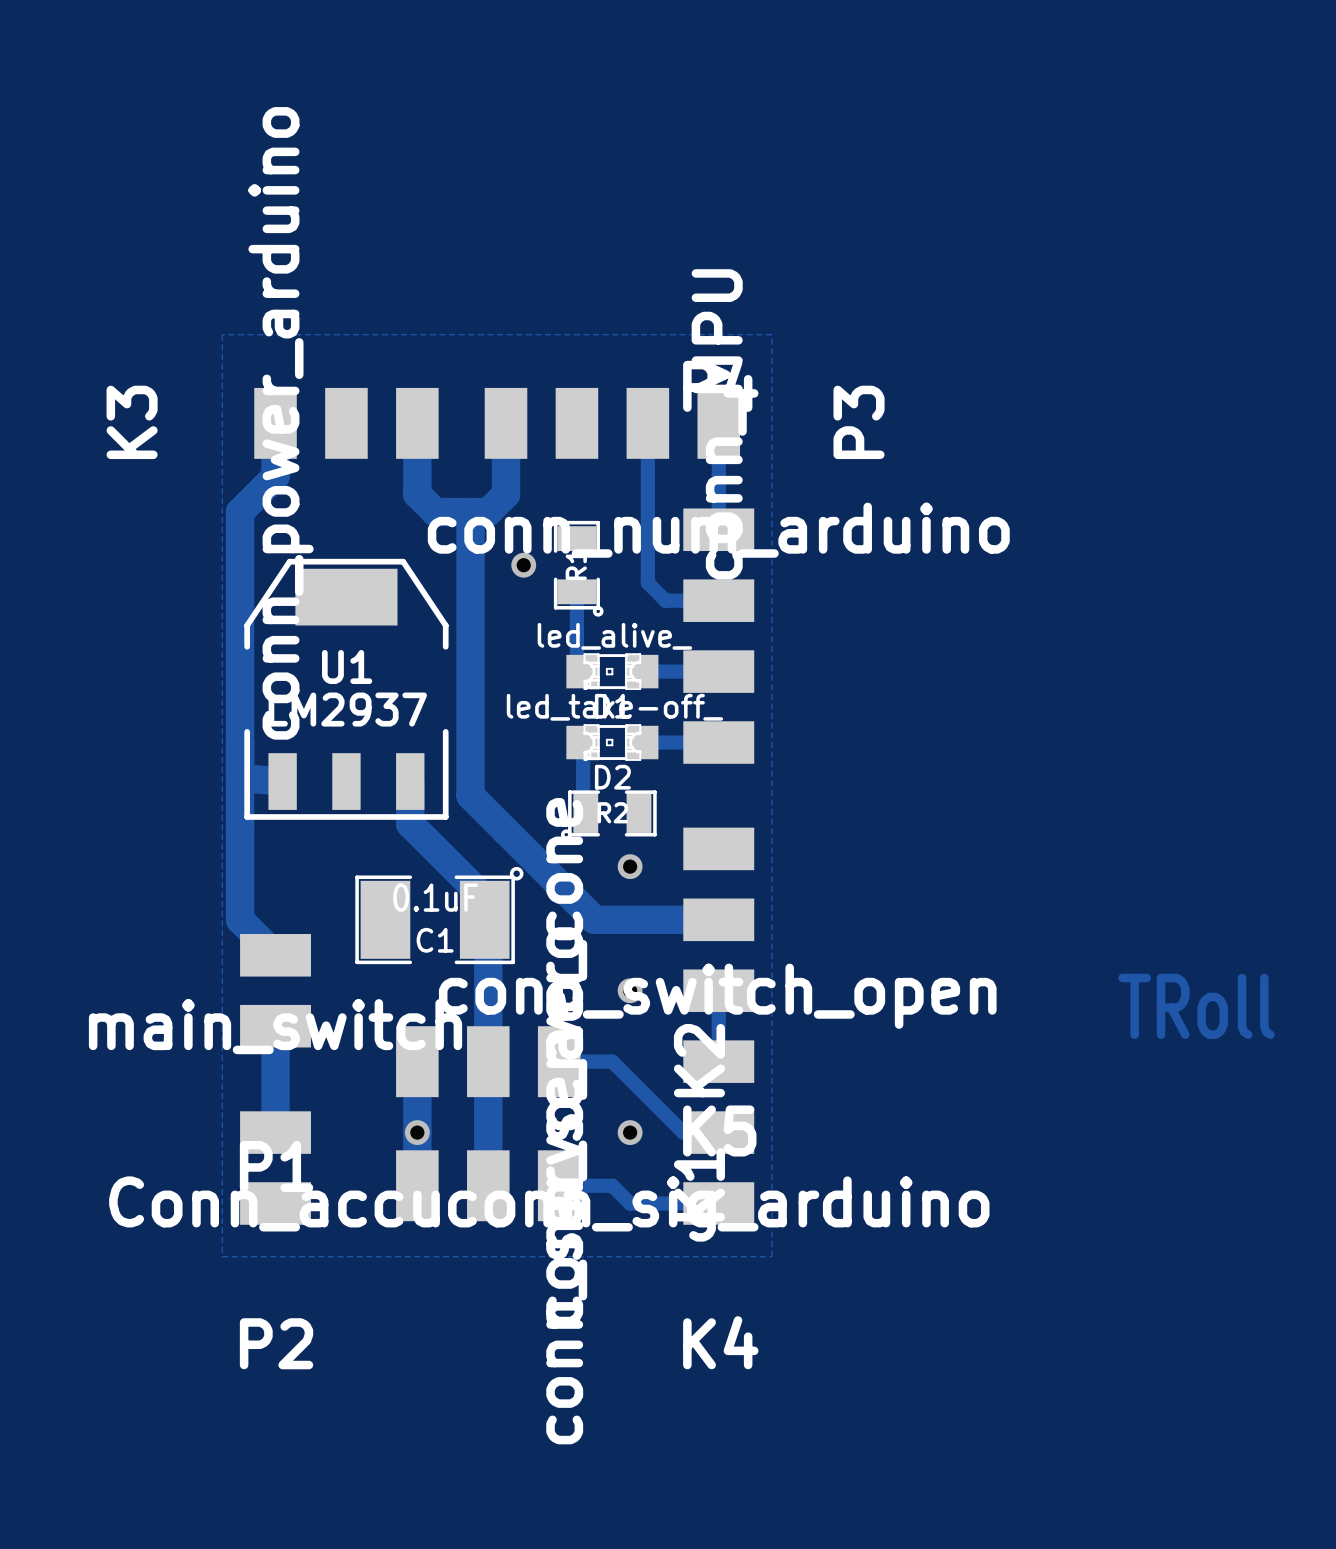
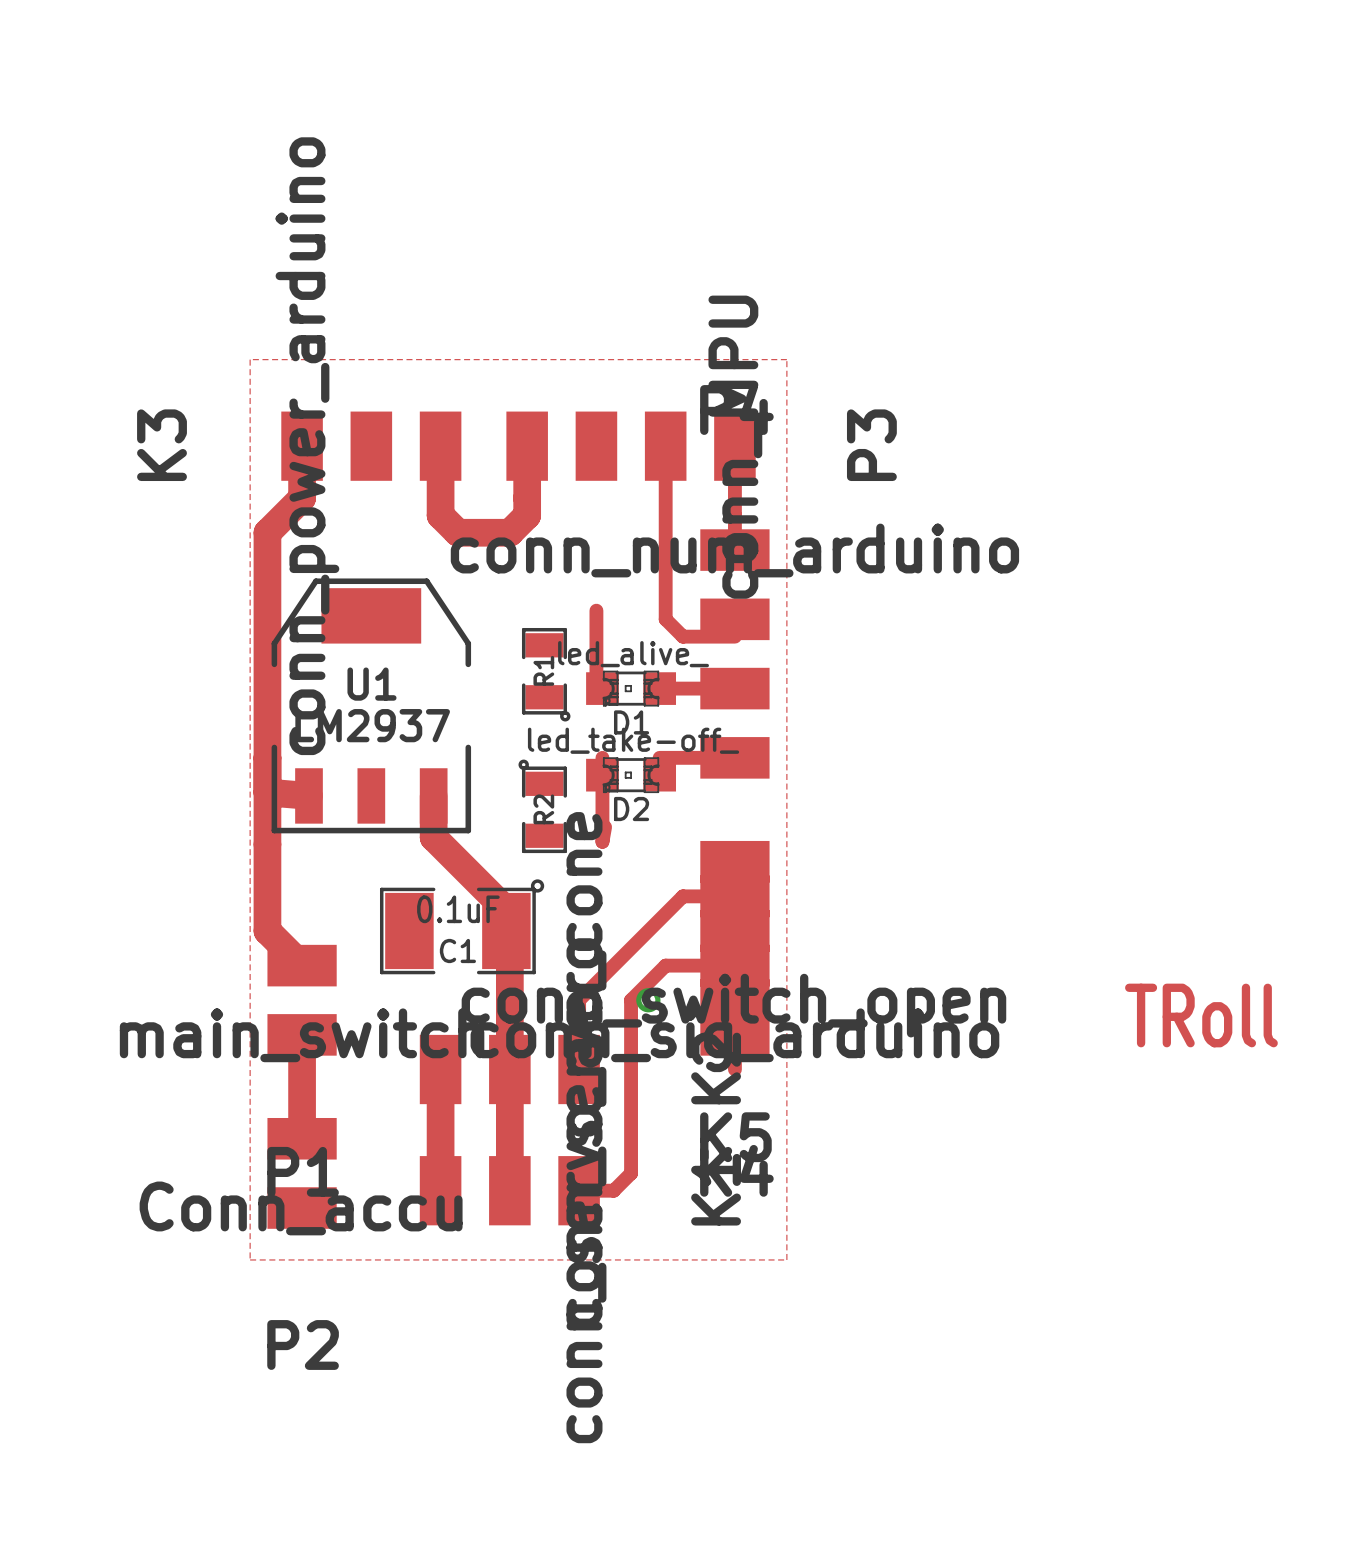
track: (470, 512) (470, 795) (594, 919) (718, 919) -> none
via: (523, 565) -> none
R1 position: (578, 568) -> (546, 674)
track: (647, 582) (665, 600) (718, 600) -> (665, 602) (665, 619) (682, 636) (734, 636)
D2 position: (612, 742) -> (631, 775)
R2 rotation: 0° (608, 815) -> 90° clockwise (542, 806)
R2 position: (608, 815) -> (542, 806)
via: (630, 866) -> none
track: (559, 1061) (612, 1061) (683, 1132) (718, 1132) -> (579, 1069) (579, 1000) (682, 896) (734, 896)
via: (417, 1132) -> none
via: (630, 1132) -> none
K4 position: (718, 1132) -> (734, 965)
track: (594, 1185) (612, 1185) (630, 1203) (718, 1203) -> (613, 1190) (631, 1173) (631, 1000) (665, 965) (734, 965)

